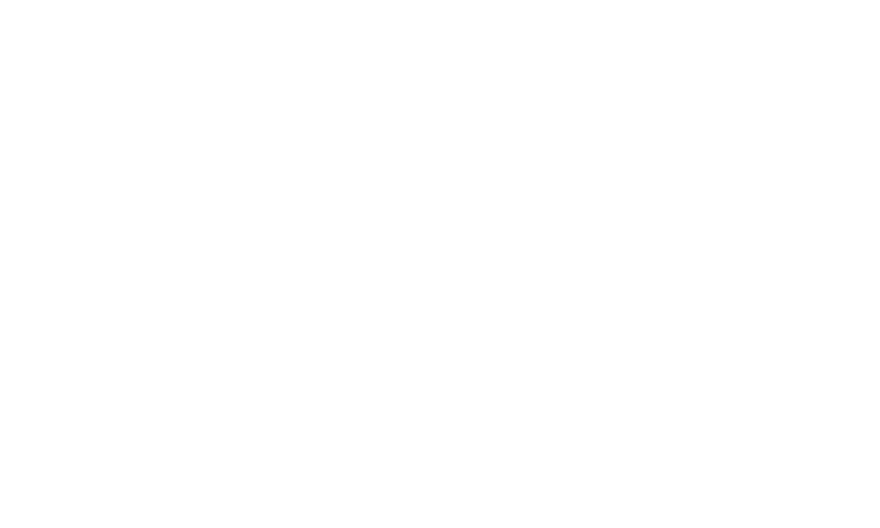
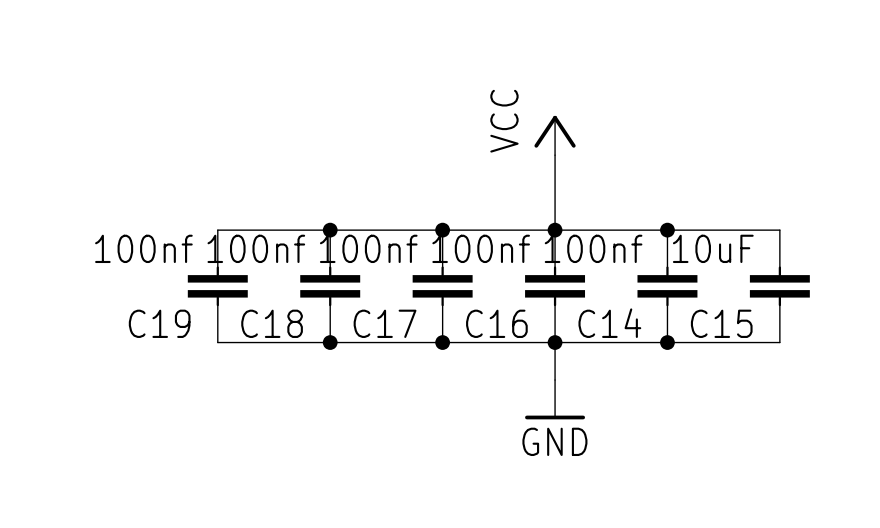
power symbol: none -> VCC (555, 135)
wire: none -> (555, 155) (555, 230)
wire: none -> (217, 230) (779, 230)
junction: none -> (330, 230)
junction: none -> (442, 230)
junction: none -> (555, 230)
junction: none -> (667, 230)
C19: none -> 100nf (217, 286)
C18: none -> 100nf (330, 286)
C17: none -> 100nf (442, 286)
C16: none -> 100nf (555, 286)
C14: none -> 100nf (667, 286)
C15: none -> 10uF (779, 286)
wire: none -> (217, 342) (779, 342)
junction: none -> (330, 342)
junction: none -> (442, 342)
wire: none -> (555, 342) (555, 380)
junction: none -> (555, 342)
junction: none -> (667, 342)
power symbol: none -> GND (555, 399)

